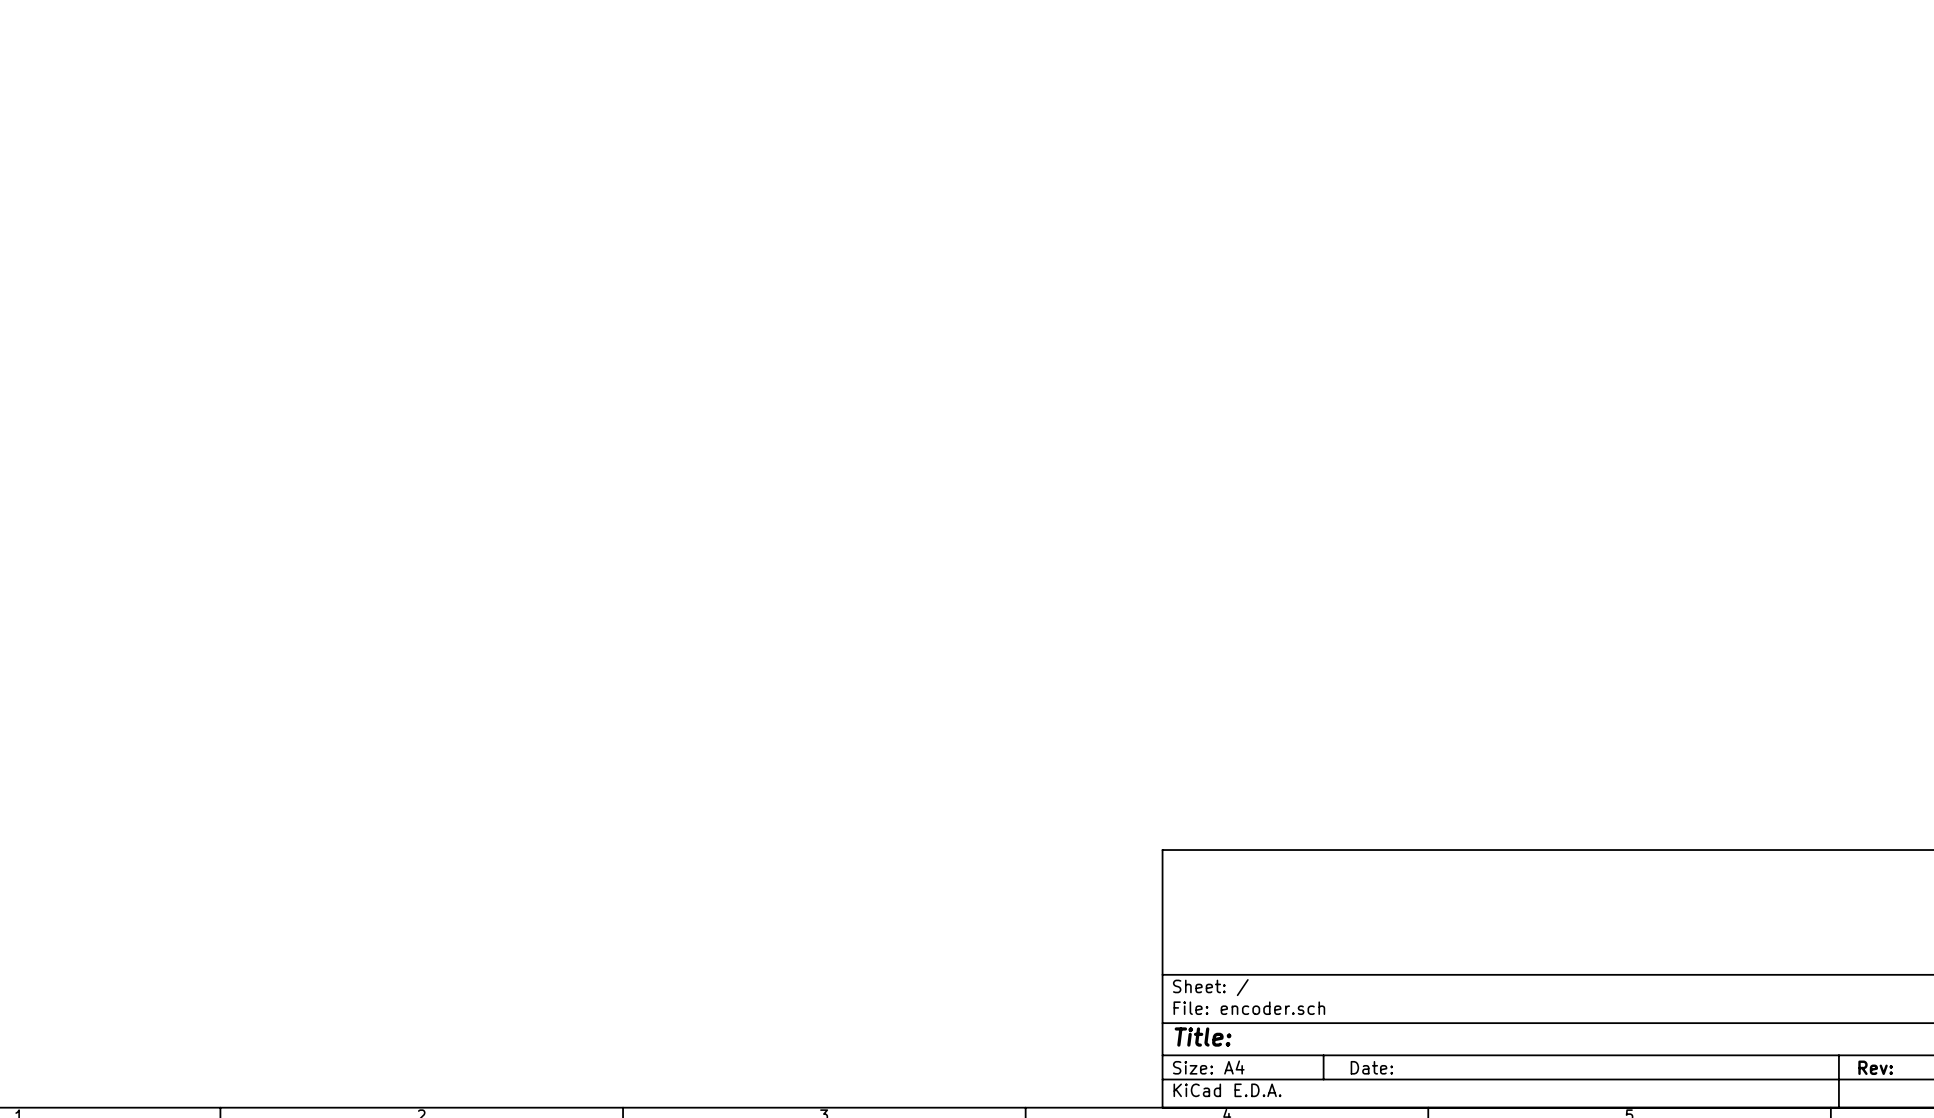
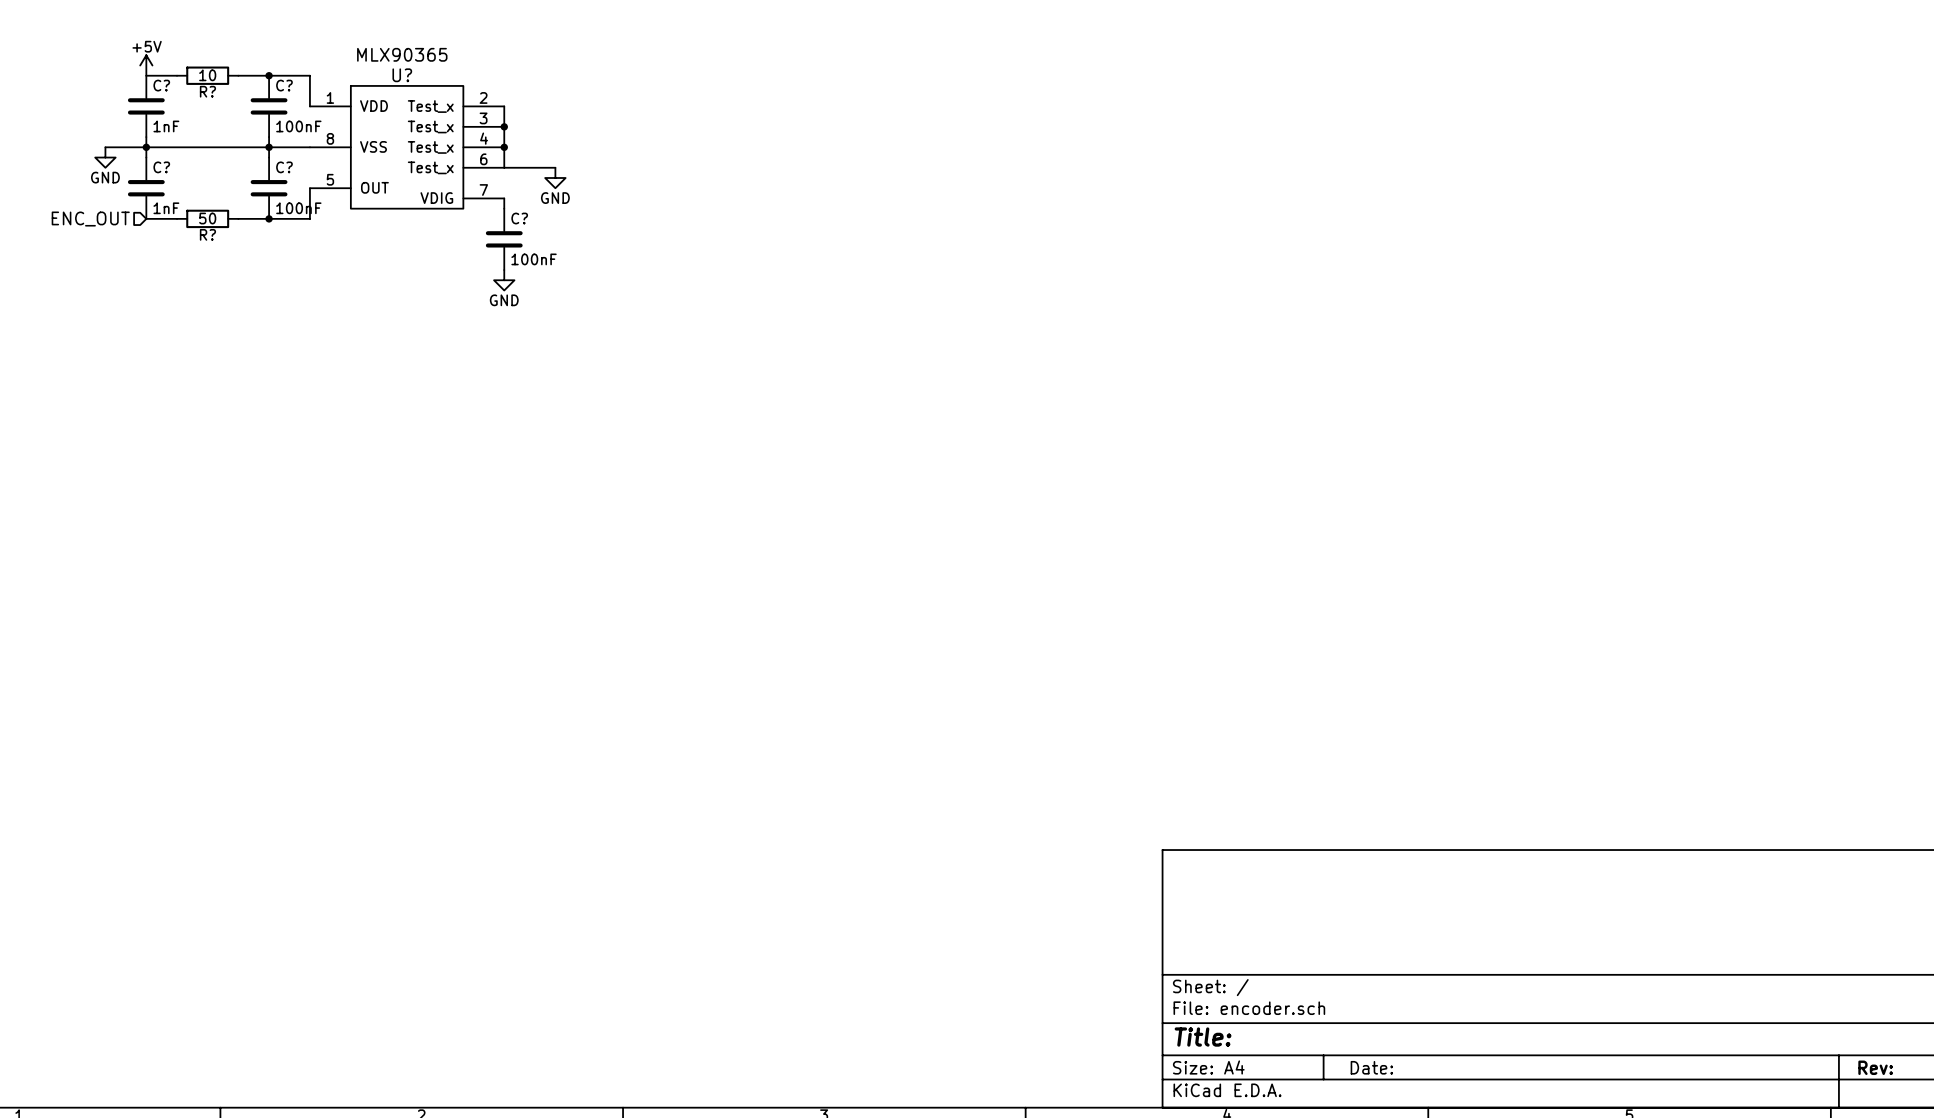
power symbol: none -> +5V (146, 65)
wire: none -> (146, 75) (177, 75)
R?: none -> 10 (207, 75)
wire: none -> (238, 75) (309, 75) (309, 106)
junction: none -> (269, 75)
C?: none -> 1nF (146, 106)
C?: none -> 100nF (269, 106)
wire: none -> (504, 106) (504, 167) (555, 167)
junction: none -> (504, 126)
wire: none -> (146, 137) (146, 157)
wire: none -> (269, 137) (269, 157)
wire: none -> (105, 147) (309, 147)
junction: none -> (146, 147)
junction: none -> (269, 147)
U?: none -> MLX90365 (407, 147)
junction: none -> (504, 147)
power symbol: none -> GND (105, 157)
power symbol: none -> GND (555, 177)
C?: none -> 1nF (146, 188)
C?: none -> 100nF (269, 188)
wire: none -> (309, 188) (309, 218) (238, 218)
wire: none -> (504, 198) (504, 208)
wire: none -> (146, 218) (177, 218)
R?: none -> 50 (207, 218)
junction: none -> (269, 218)
hierarchical label: none -> ENC_OUT (90, 219)
C?: none -> 100nF (504, 239)
power symbol: none -> GND (504, 280)

